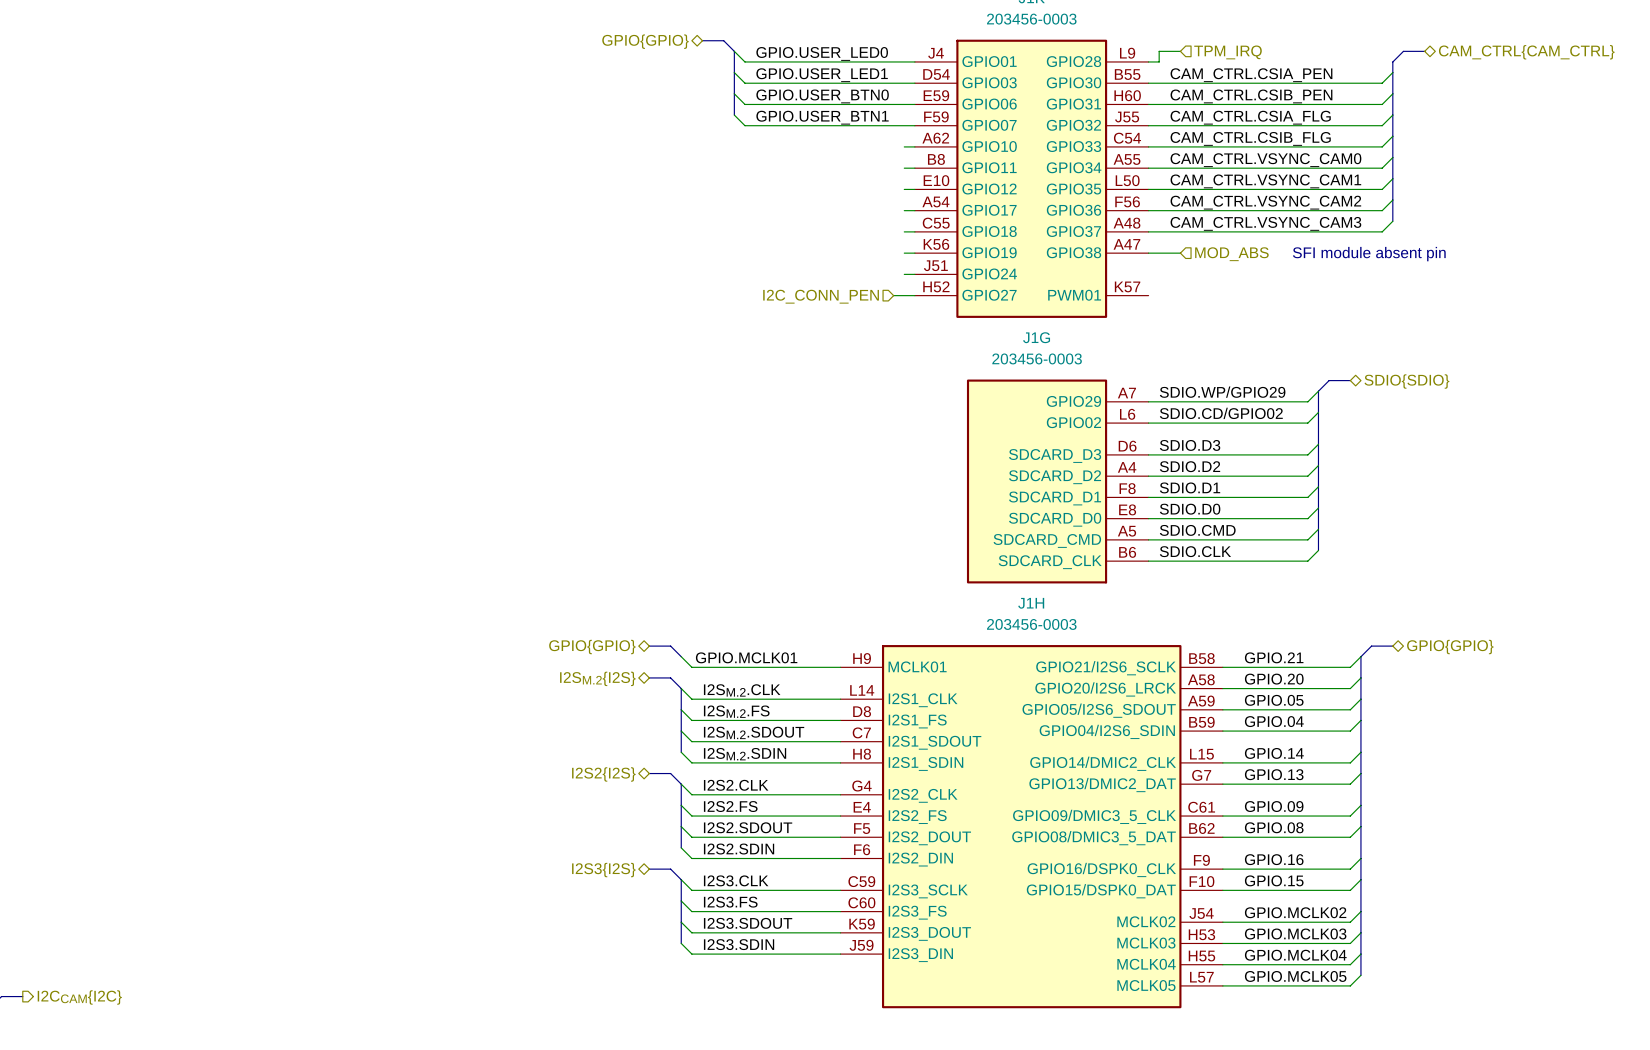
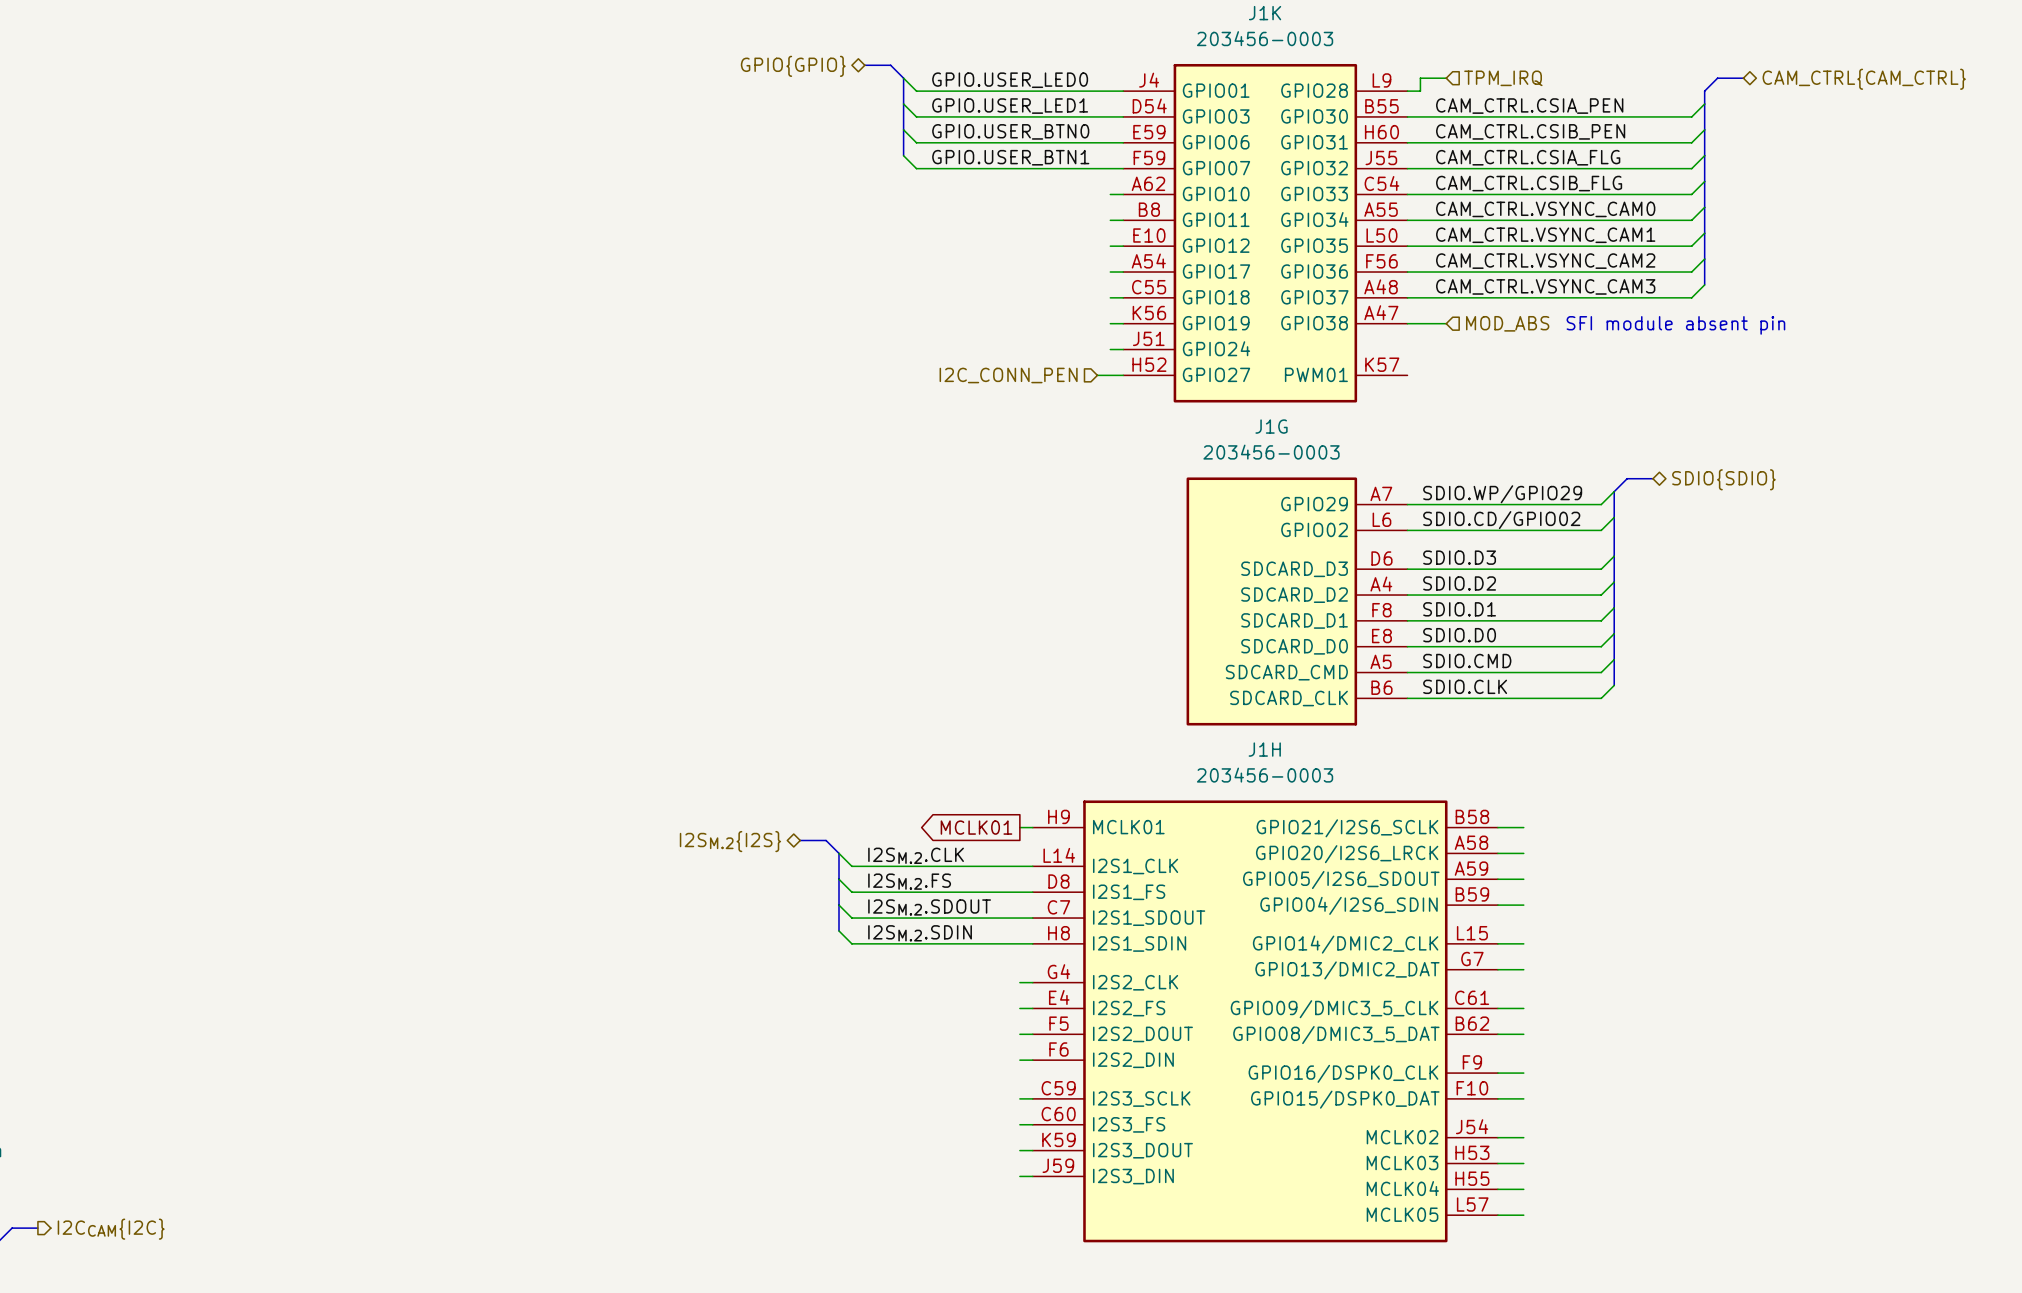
bus: (649, 646) (670, 646) (681, 656) -> none
bus: (1392, 646) (1371, 646) (1360, 656) (1360, 975) -> none
hierarchical label: GPIO{GPIO} (592, 647) -> none
hierarchical label: GPIO{GPIO} (1450, 647) -> none
wire: (681, 656) (691, 667) (829, 667) -> none
wire: (1360, 656) (1350, 667) (1244, 667) -> none
label: GPIO.MCLK01 (746, 657) -> none
label: GPIO.21 (1274, 657) -> none
global label: none -> MCLK01 (976, 827)
wire: (1360, 677) (1350, 688) (1244, 688) -> none
label: GPIO.20 (1274, 679) -> none
wire: (1360, 699) (1350, 709) (1244, 709) -> none
label: GPIO.05 (1274, 700) -> none
wire: (1360, 720) (1350, 731) (1244, 731) -> none
label: GPIO.04 (1274, 721) -> none
wire: (1360, 752) (1350, 762) (1244, 762) -> none
label: GPIO.14 (1274, 753) -> none
bus: (649, 773) (670, 773) (681, 784) (681, 847) -> none
wire: (1360, 773) (1350, 784) (1244, 784) -> none
hierarchical label: I2S2{I2S} (603, 774) -> none
label: GPIO.13 (1274, 774) -> none
wire: (681, 784) (691, 794) (829, 794) -> none
label: I2S2.CLK (736, 785) -> none
wire: (681, 805) (691, 816) (829, 816) -> none
wire: (1360, 805) (1350, 816) (1244, 816) -> none
label: I2S2.FS (730, 806) -> none
label: GPIO.09 (1274, 806) -> none
wire: (681, 826) (691, 837) (829, 837) -> none
wire: (1360, 826) (1350, 837) (1244, 837) -> none
label: I2S2.SDOUT (748, 827) -> none
label: GPIO.08 (1274, 827) -> none
wire: (681, 847) (691, 858) (829, 858) -> none
label: I2S2.SDIN (739, 849) -> none
wire: (1360, 858) (1350, 869) (1244, 869) -> none
label: GPIO.16 (1274, 859) -> none
bus: (649, 869) (670, 869) (681, 879) (681, 943) -> none
hierarchical label: I2S3{I2S} (603, 870) -> none
wire: (681, 879) (691, 890) (829, 890) -> none
wire: (1360, 879) (1350, 890) (1244, 890) -> none
label: I2S3.CLK (736, 880) -> none
label: GPIO.15 (1274, 880) -> none
wire: (681, 900) (691, 911) (829, 911) -> none
label: I2S3.FS (730, 902) -> none
wire: (1360, 911) (1350, 922) (1244, 922) -> none
label: GPIO.MCLK02 (1295, 912) -> none
wire: (681, 922) (691, 932) (829, 932) -> none
label: I2S3.SDOUT (748, 923) -> none
wire: (1360, 932) (1350, 943) (1244, 943) -> none
label: GPIO.MCLK03 (1295, 933) -> none
wire: (681, 943) (691, 954) (829, 954) -> none
label: I2S3.SDIN (739, 944) -> none
wire: (1360, 954) (1350, 964) (1244, 964) -> none
label: GPIO.MCLK04 (1295, 955) -> none
wire: (1360, 975) (1350, 985) (1244, 985) -> none
label: GPIO.MCLK05 (1295, 976) -> none

